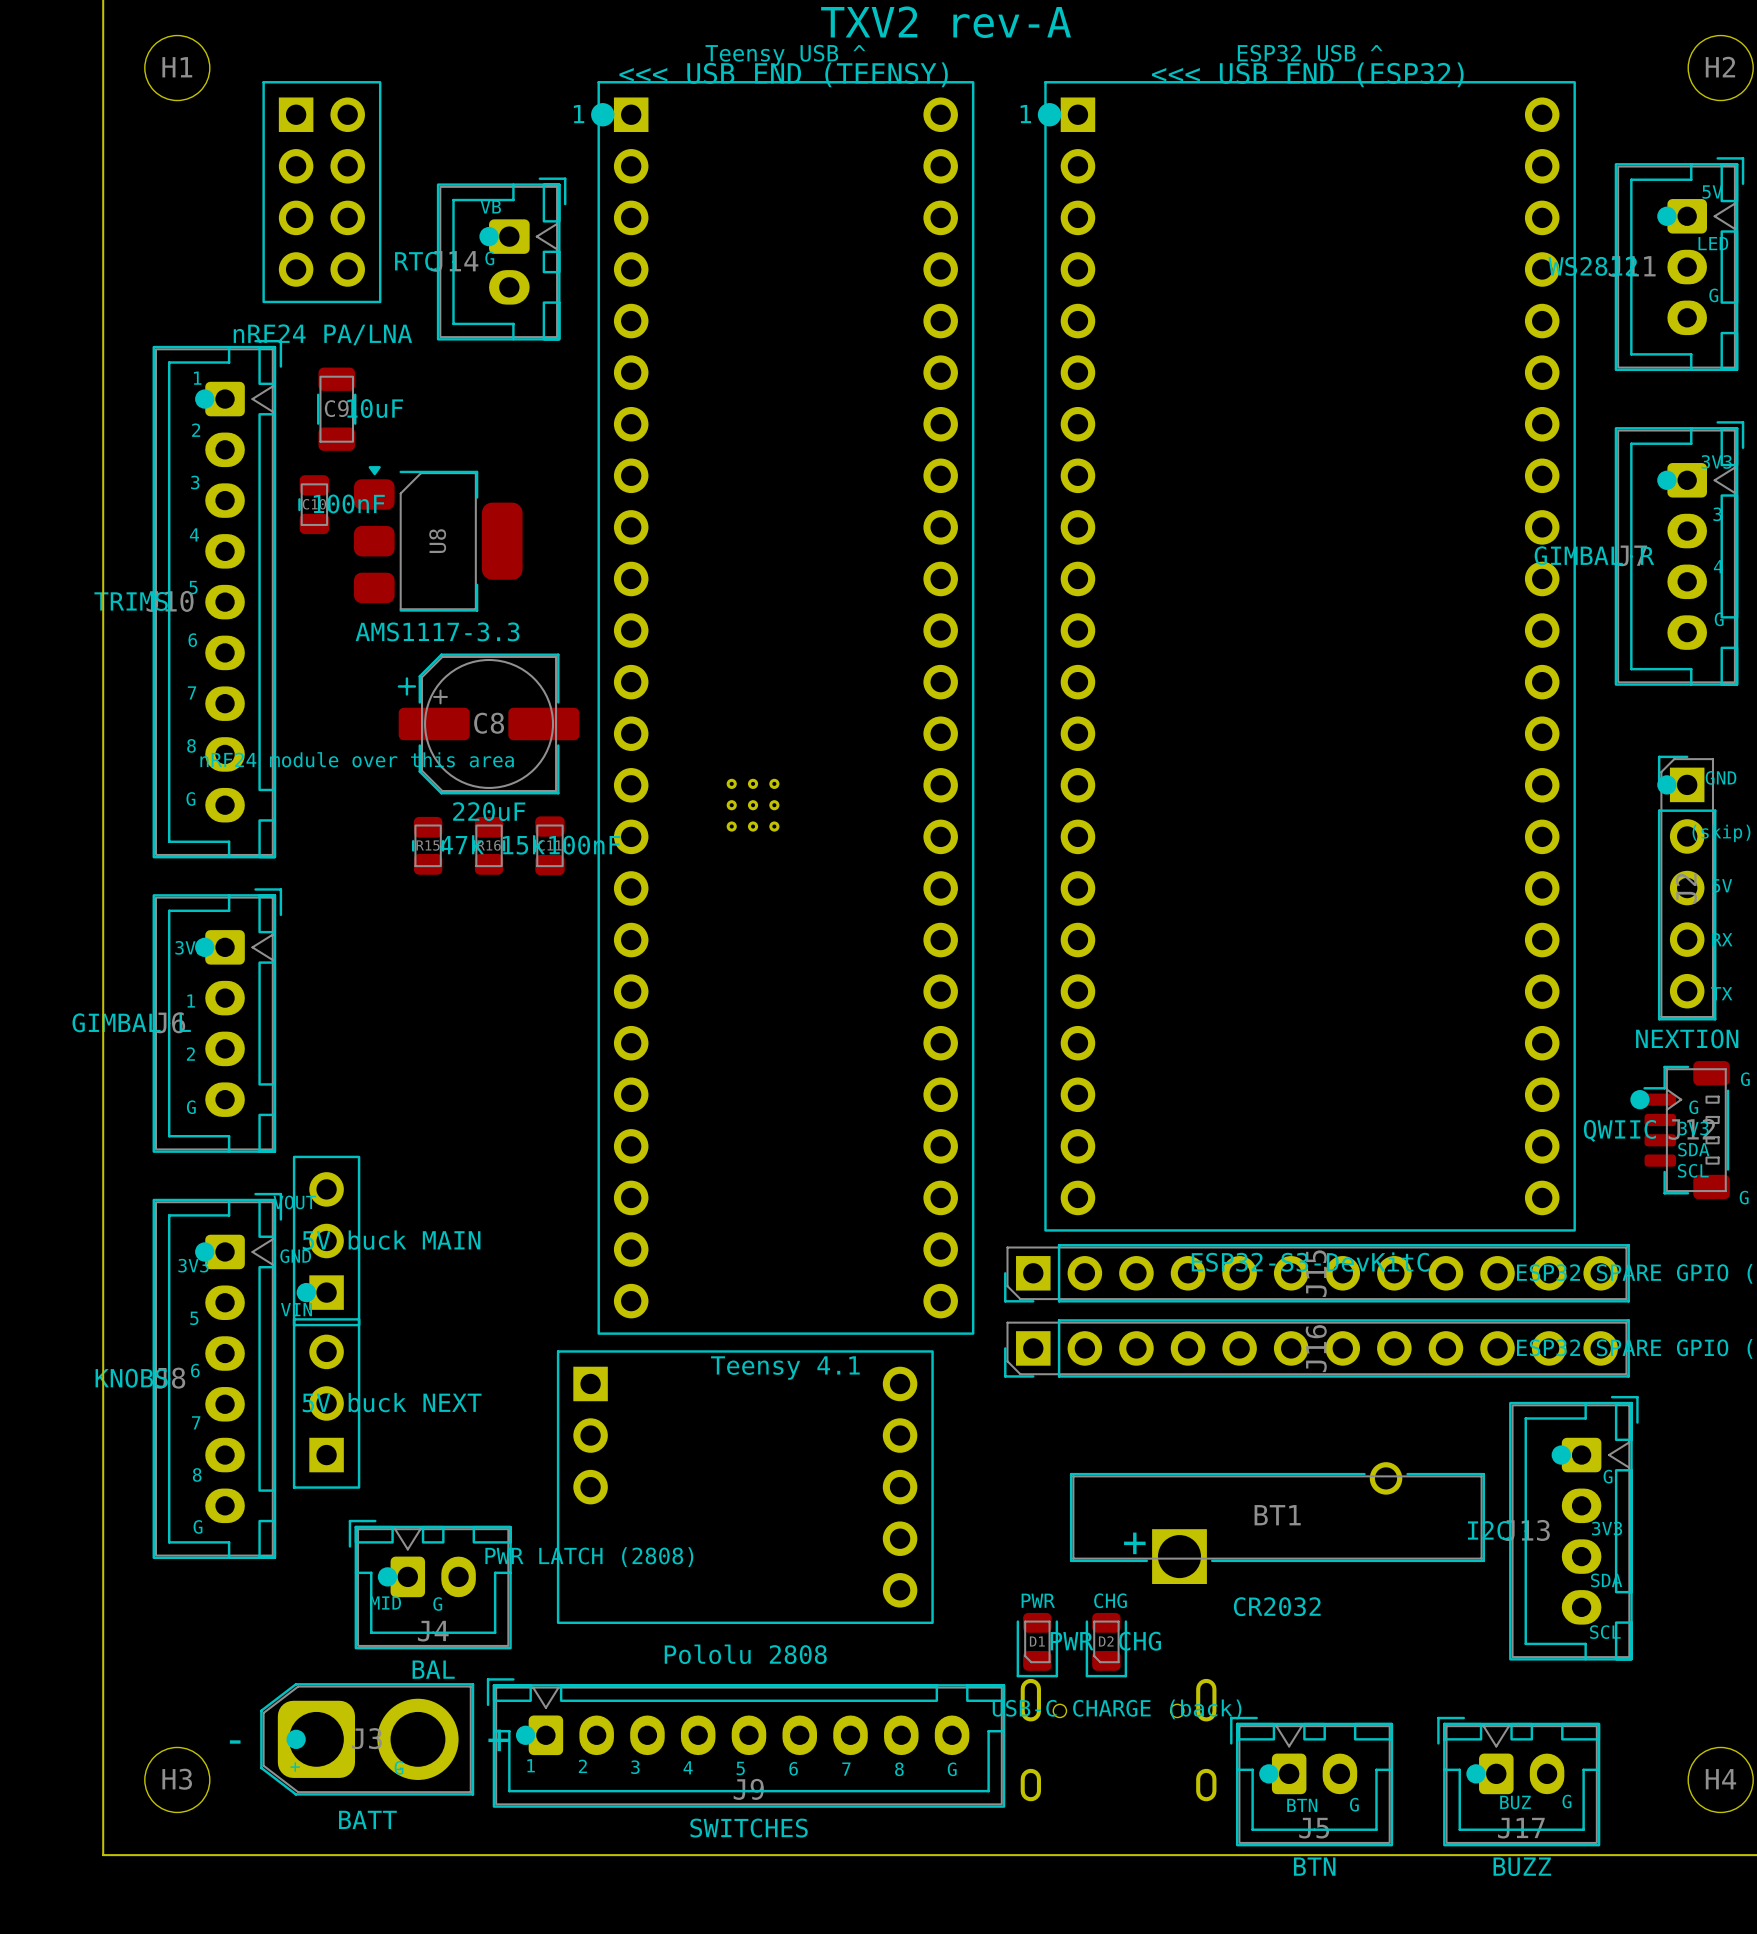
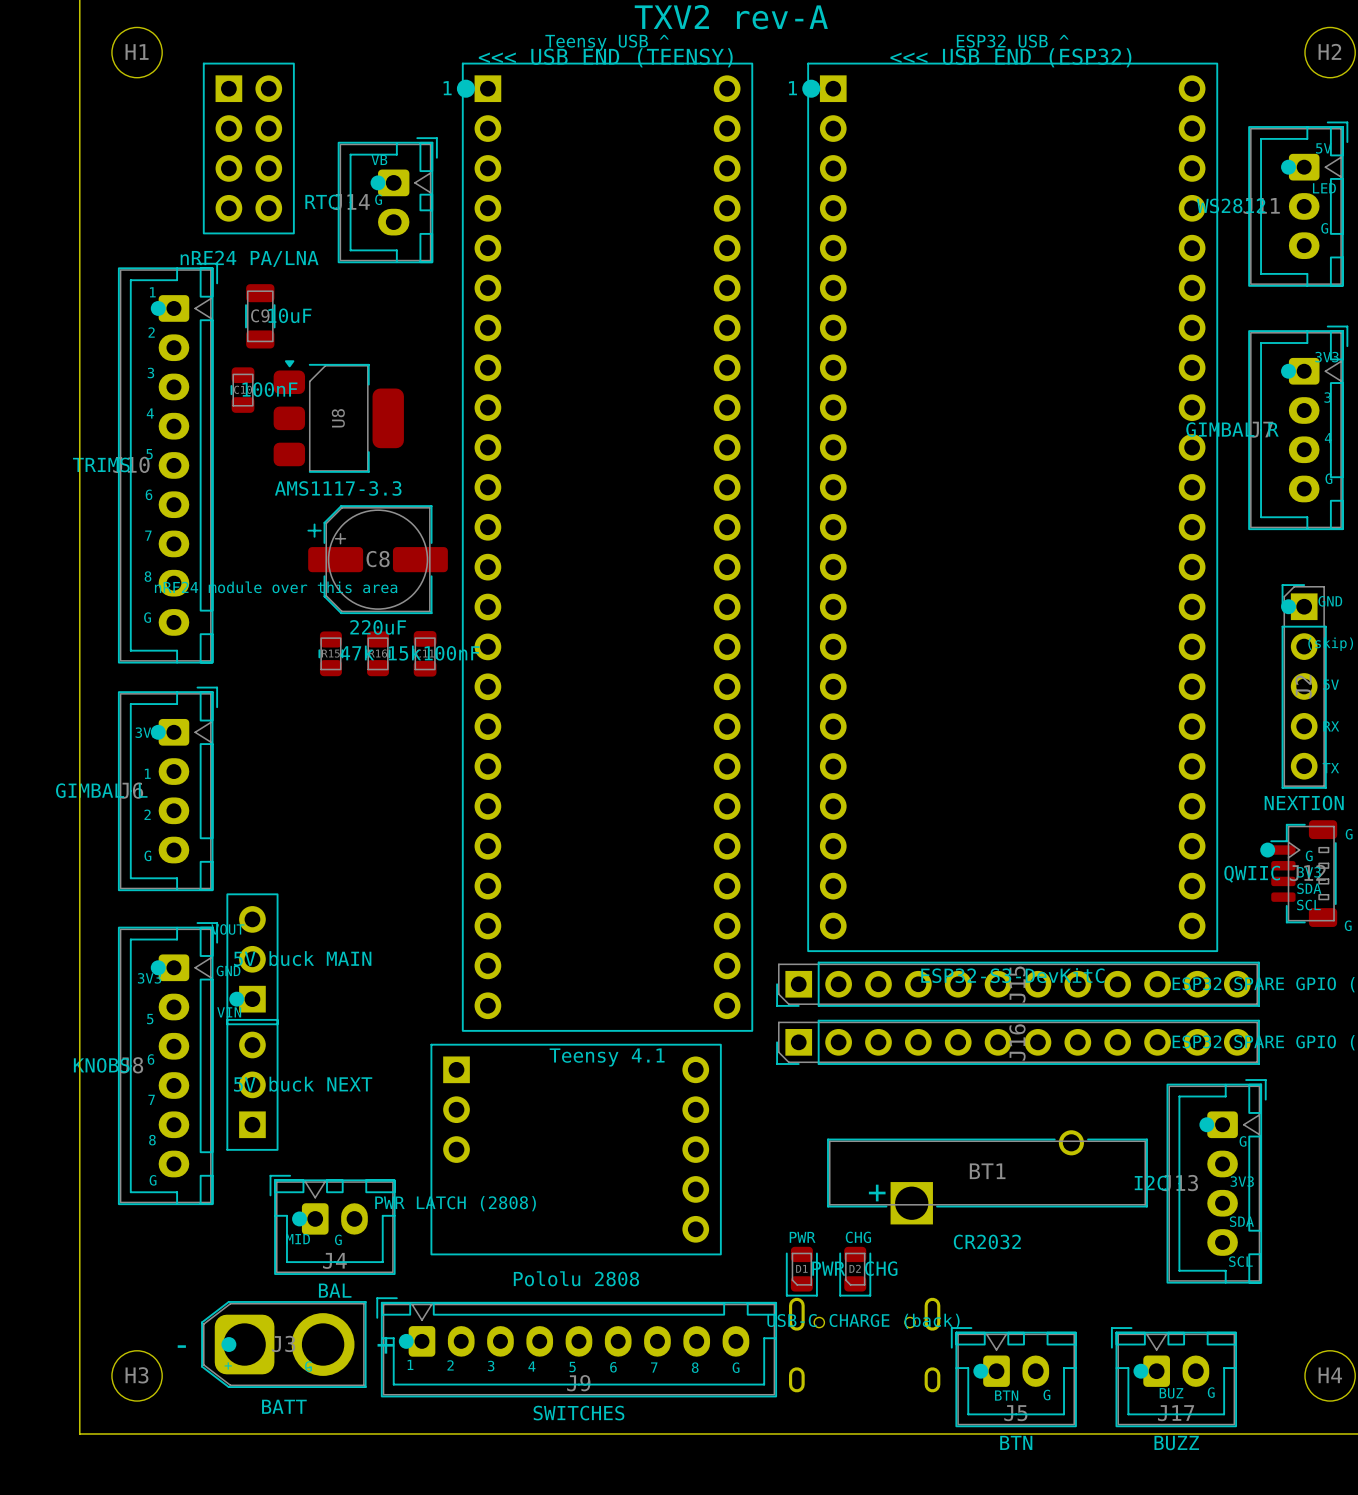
part: (753, 805) -> none

